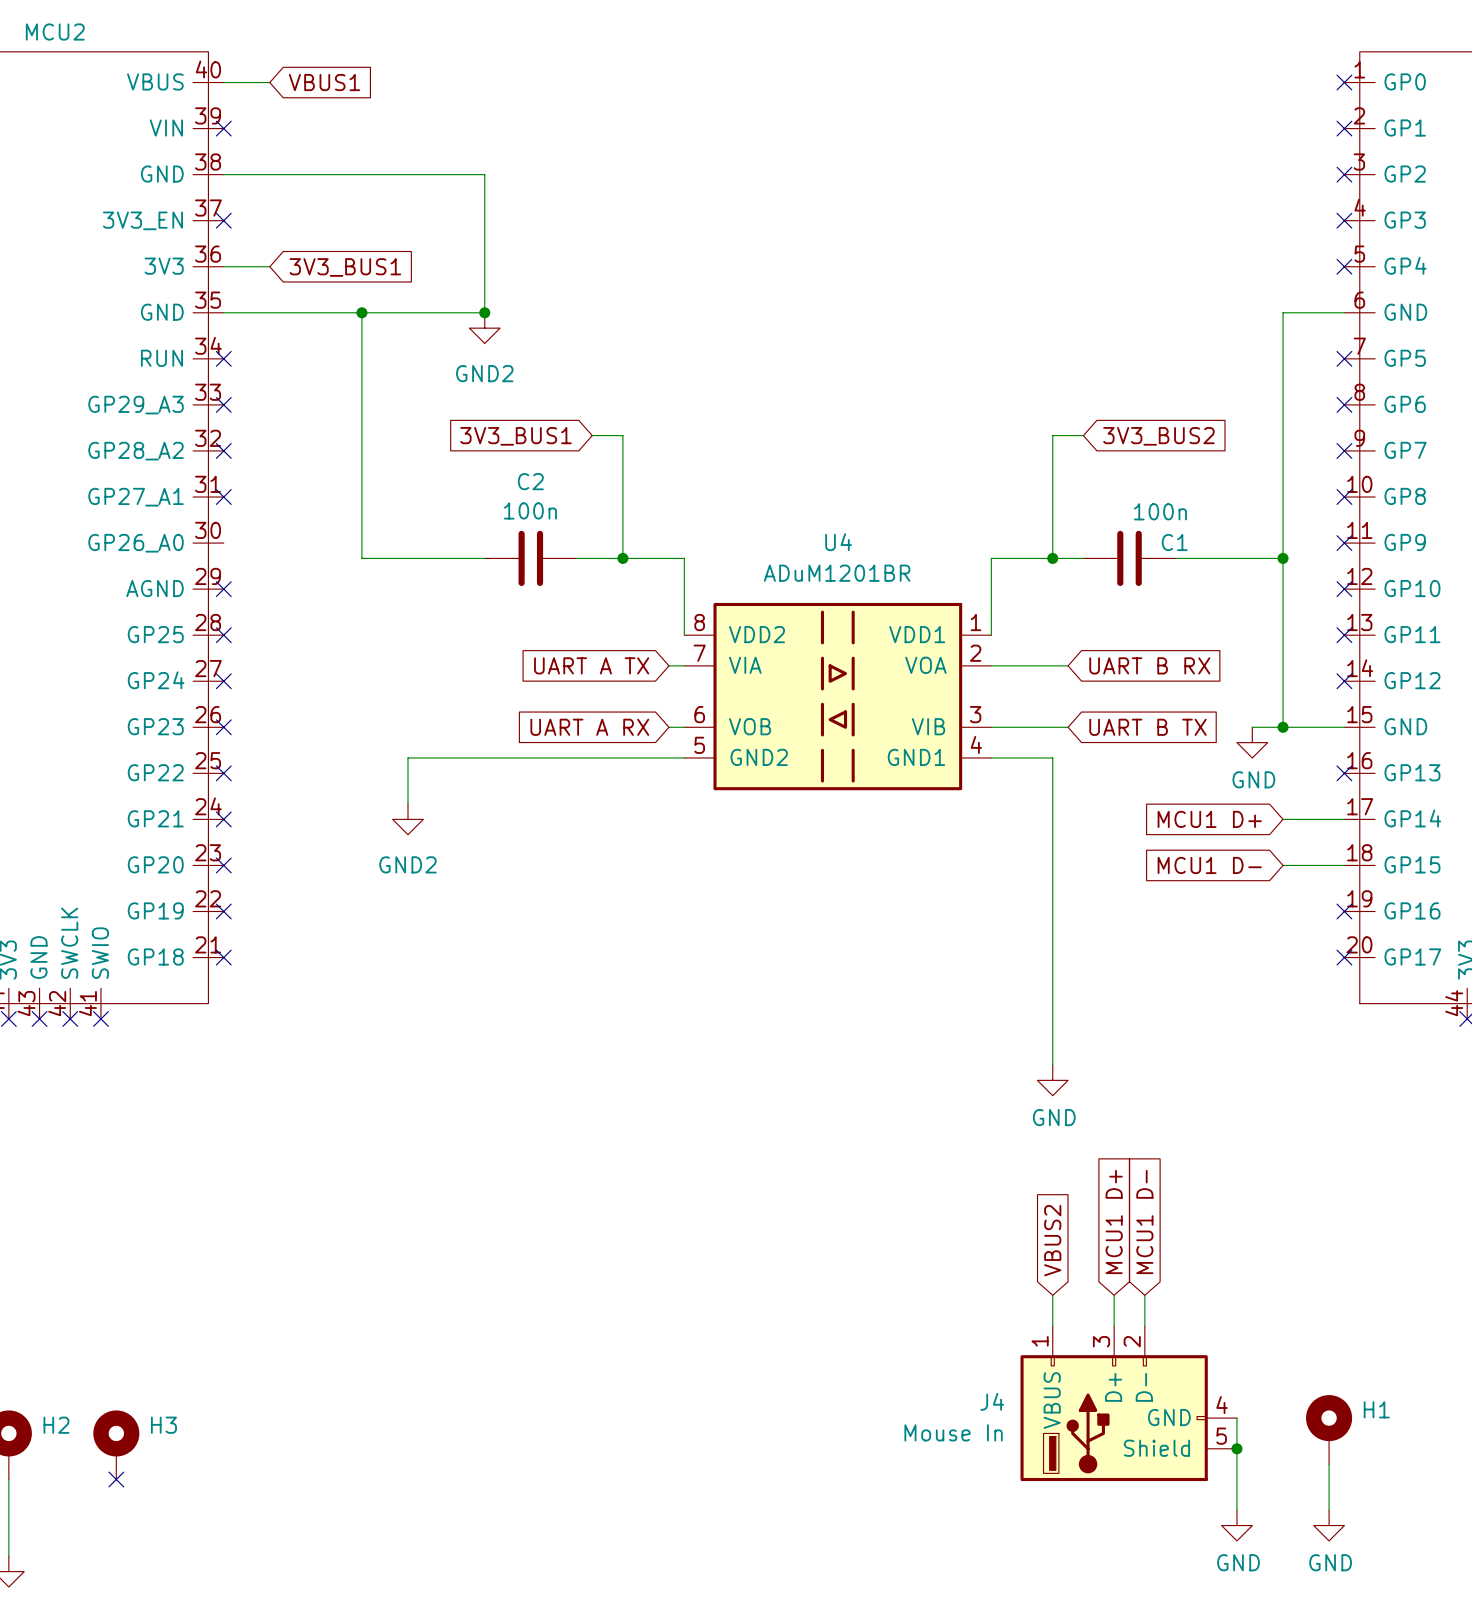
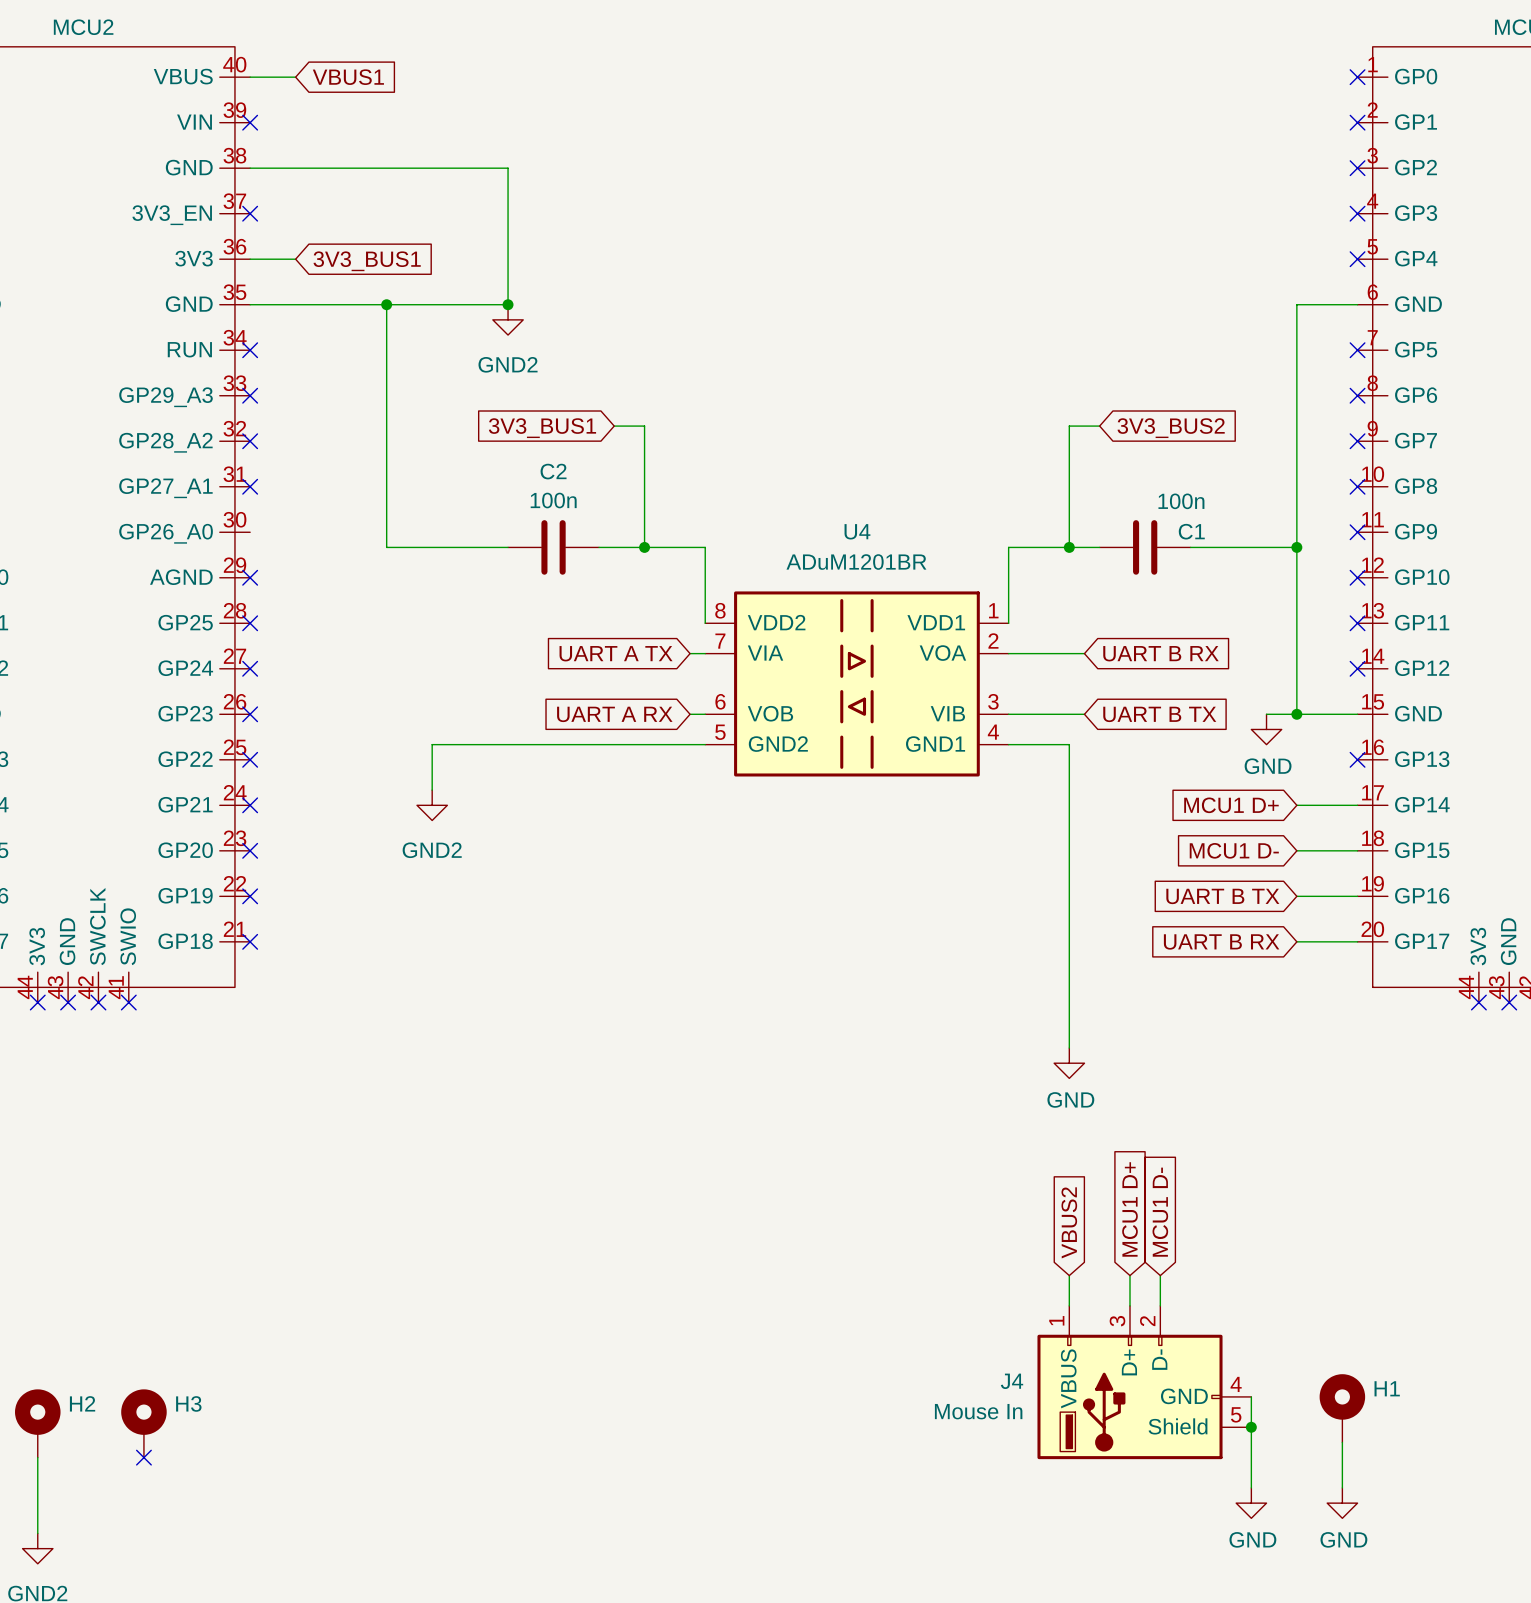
global label: none -> UART B TX (1222, 896)
wire: none -> (1296, 896) (1357, 896)
no-connect mark: (1344, 911) -> none
global label: none -> UART B RX (1221, 941)
wire: none -> (1296, 941) (1357, 941)
no-connect mark: (1344, 957) -> none

